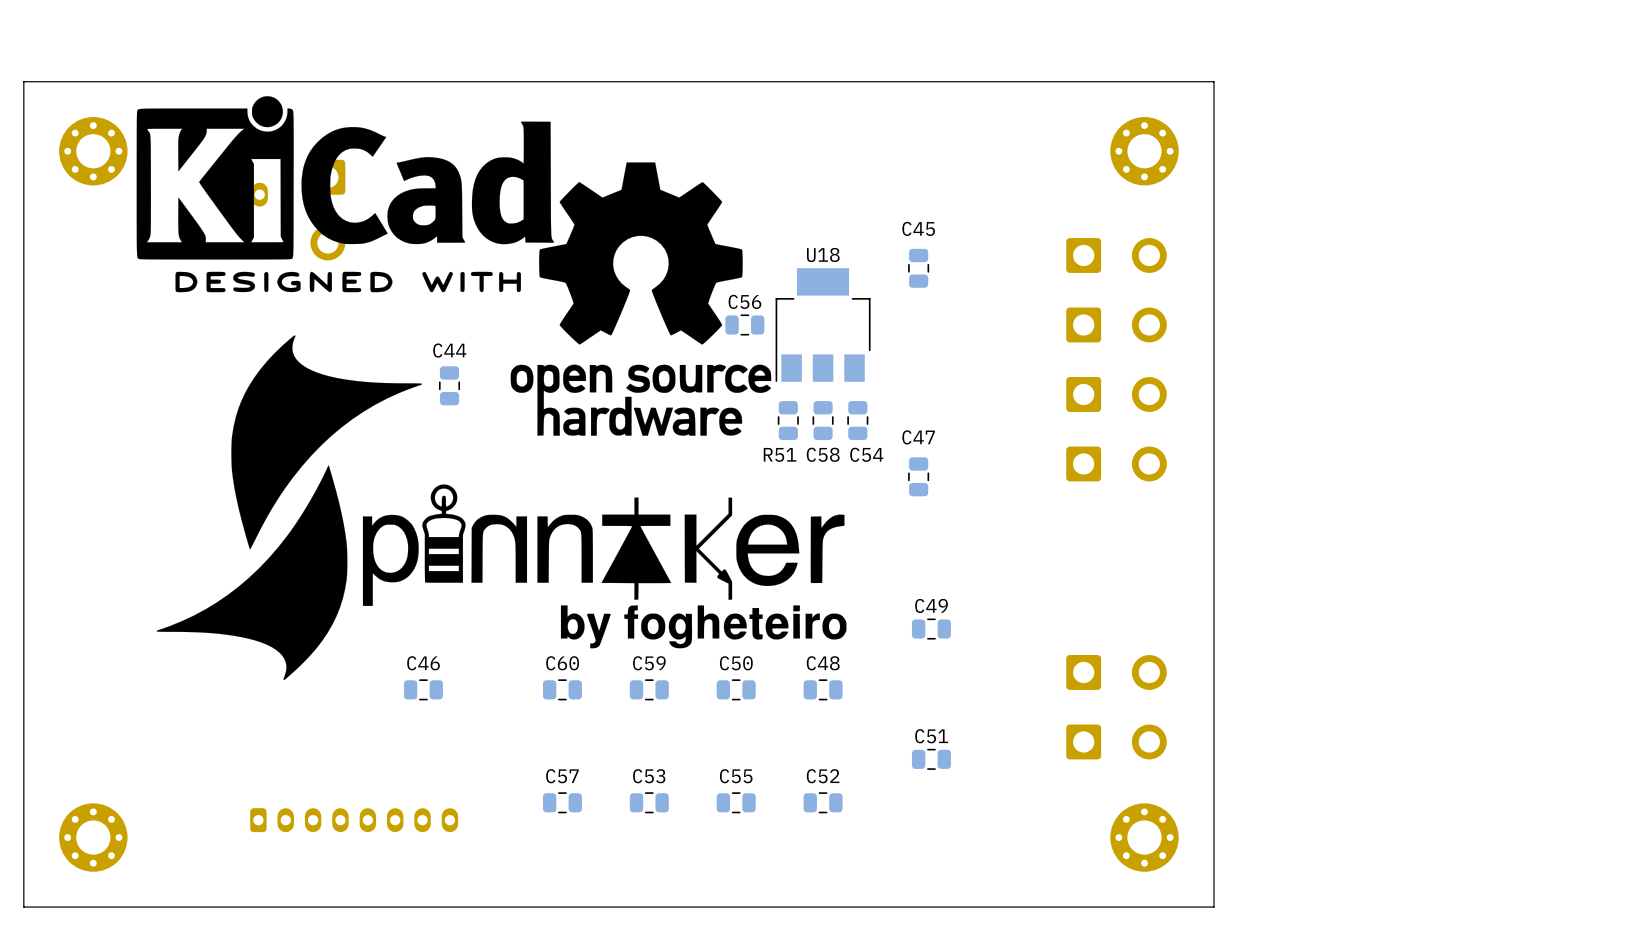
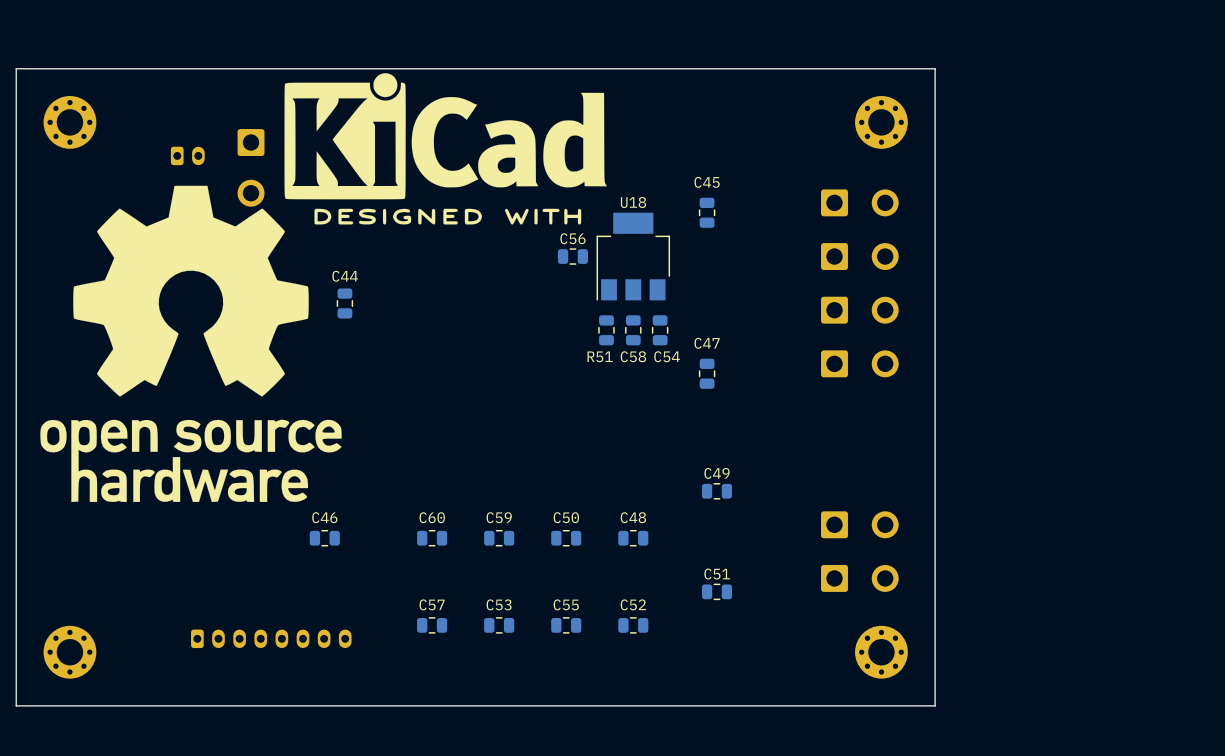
drawing: [156, 162, 847, 681] -> none
drawing position: (345, 194) -> (445, 148)
drawing: none -> [40, 185, 342, 503]

